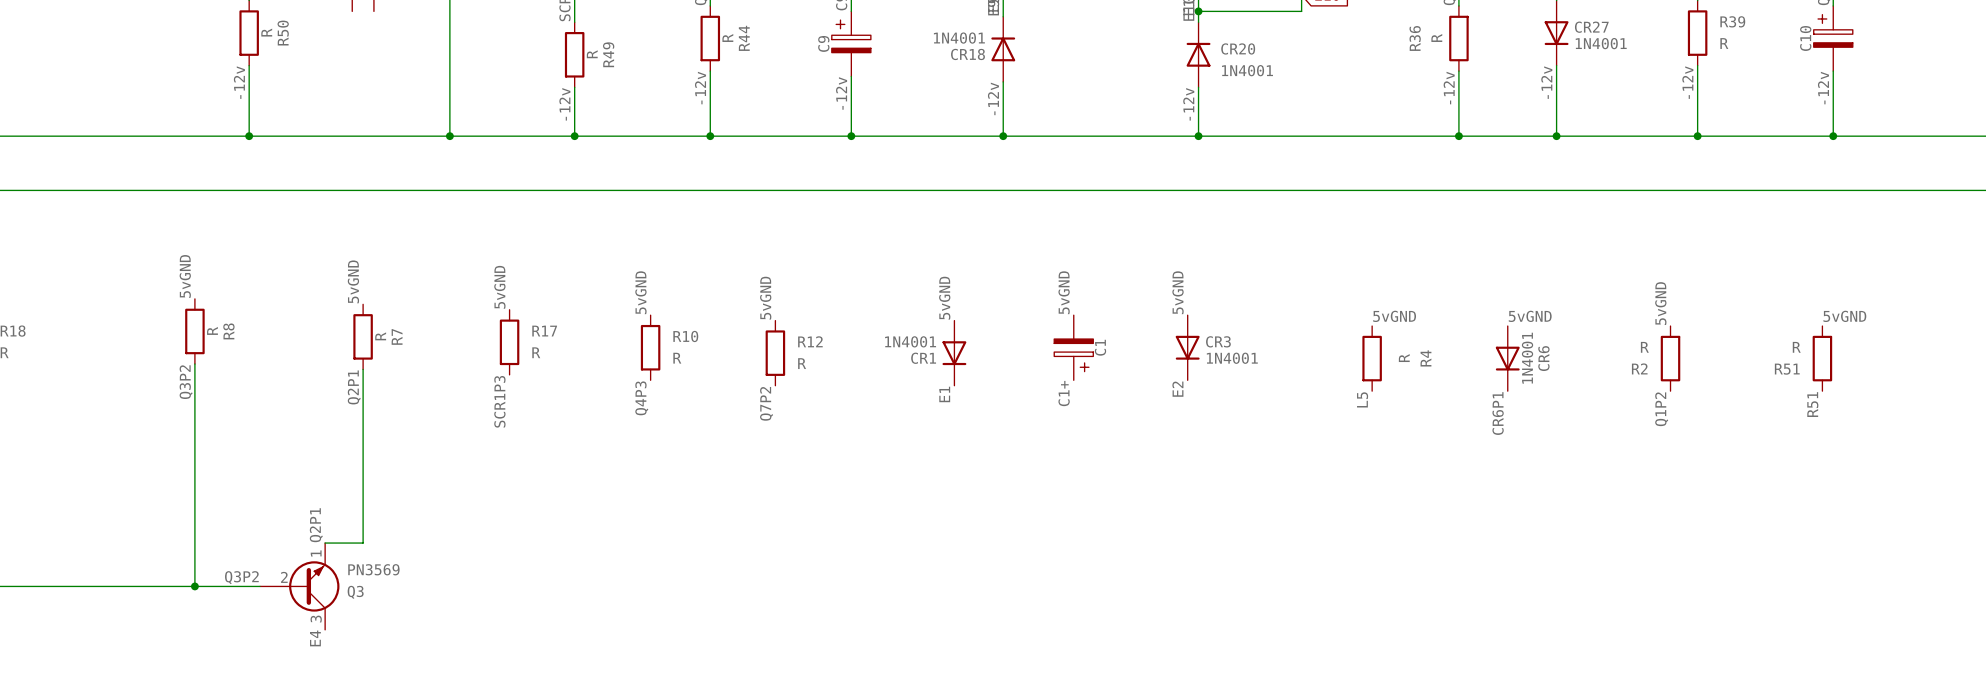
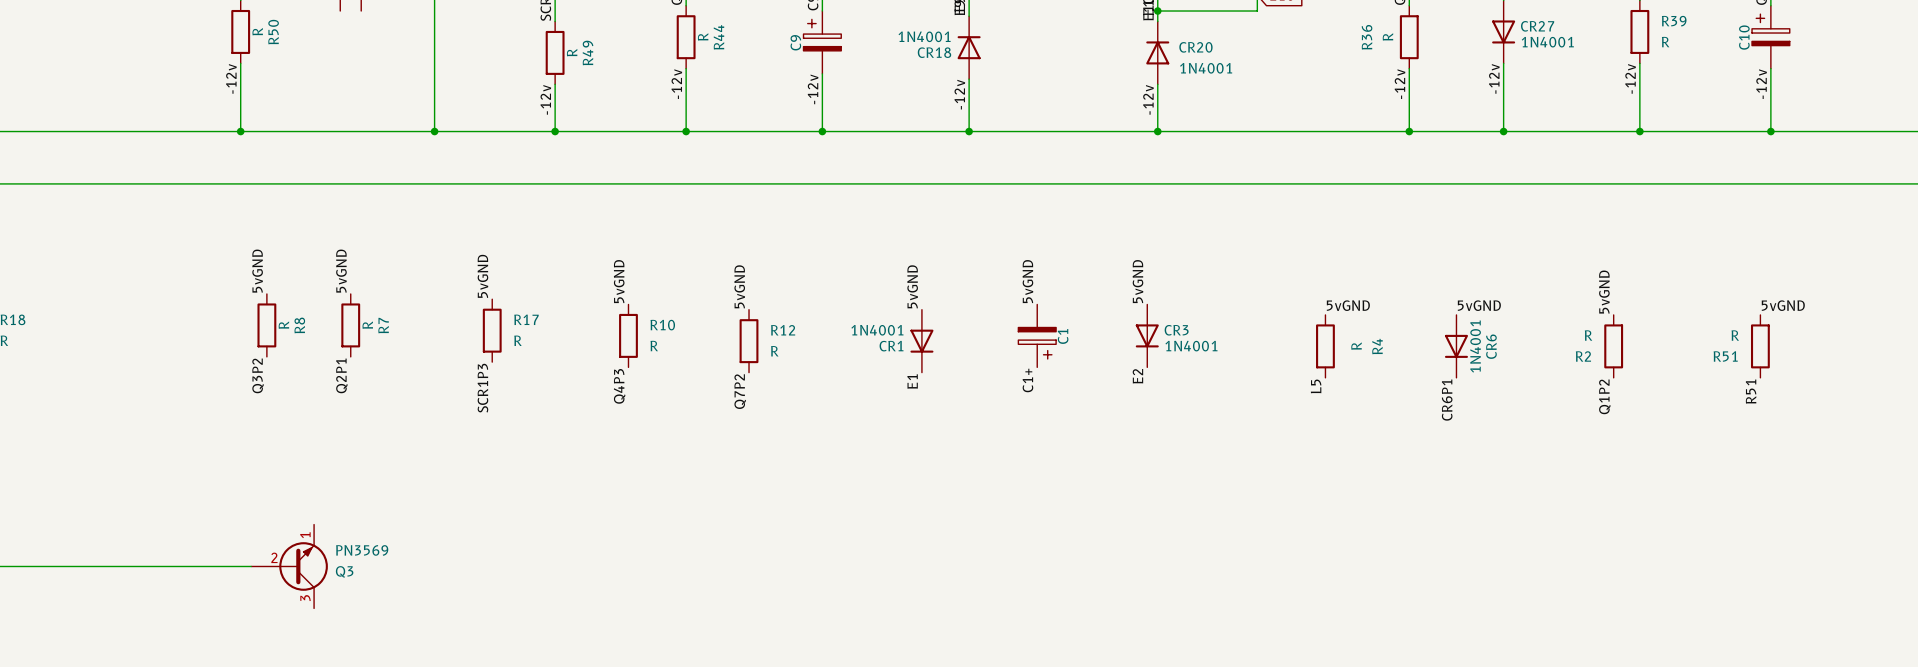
label position: 5vGND (185, 276) -> 5vGND (257, 271)
R8 position: (194, 331) -> (266, 325)
wire: (194, 364) (194, 586) -> none
wire: (363, 369) (363, 543) (325, 543) -> none
label position: Q3P2 (186, 382) -> Q3P2 (258, 375)
label: Q2P1 (316, 525) -> none
label: Q3P2 (241, 577) -> none
junction: (194, 586) -> none
label: E4 (315, 638) -> none

